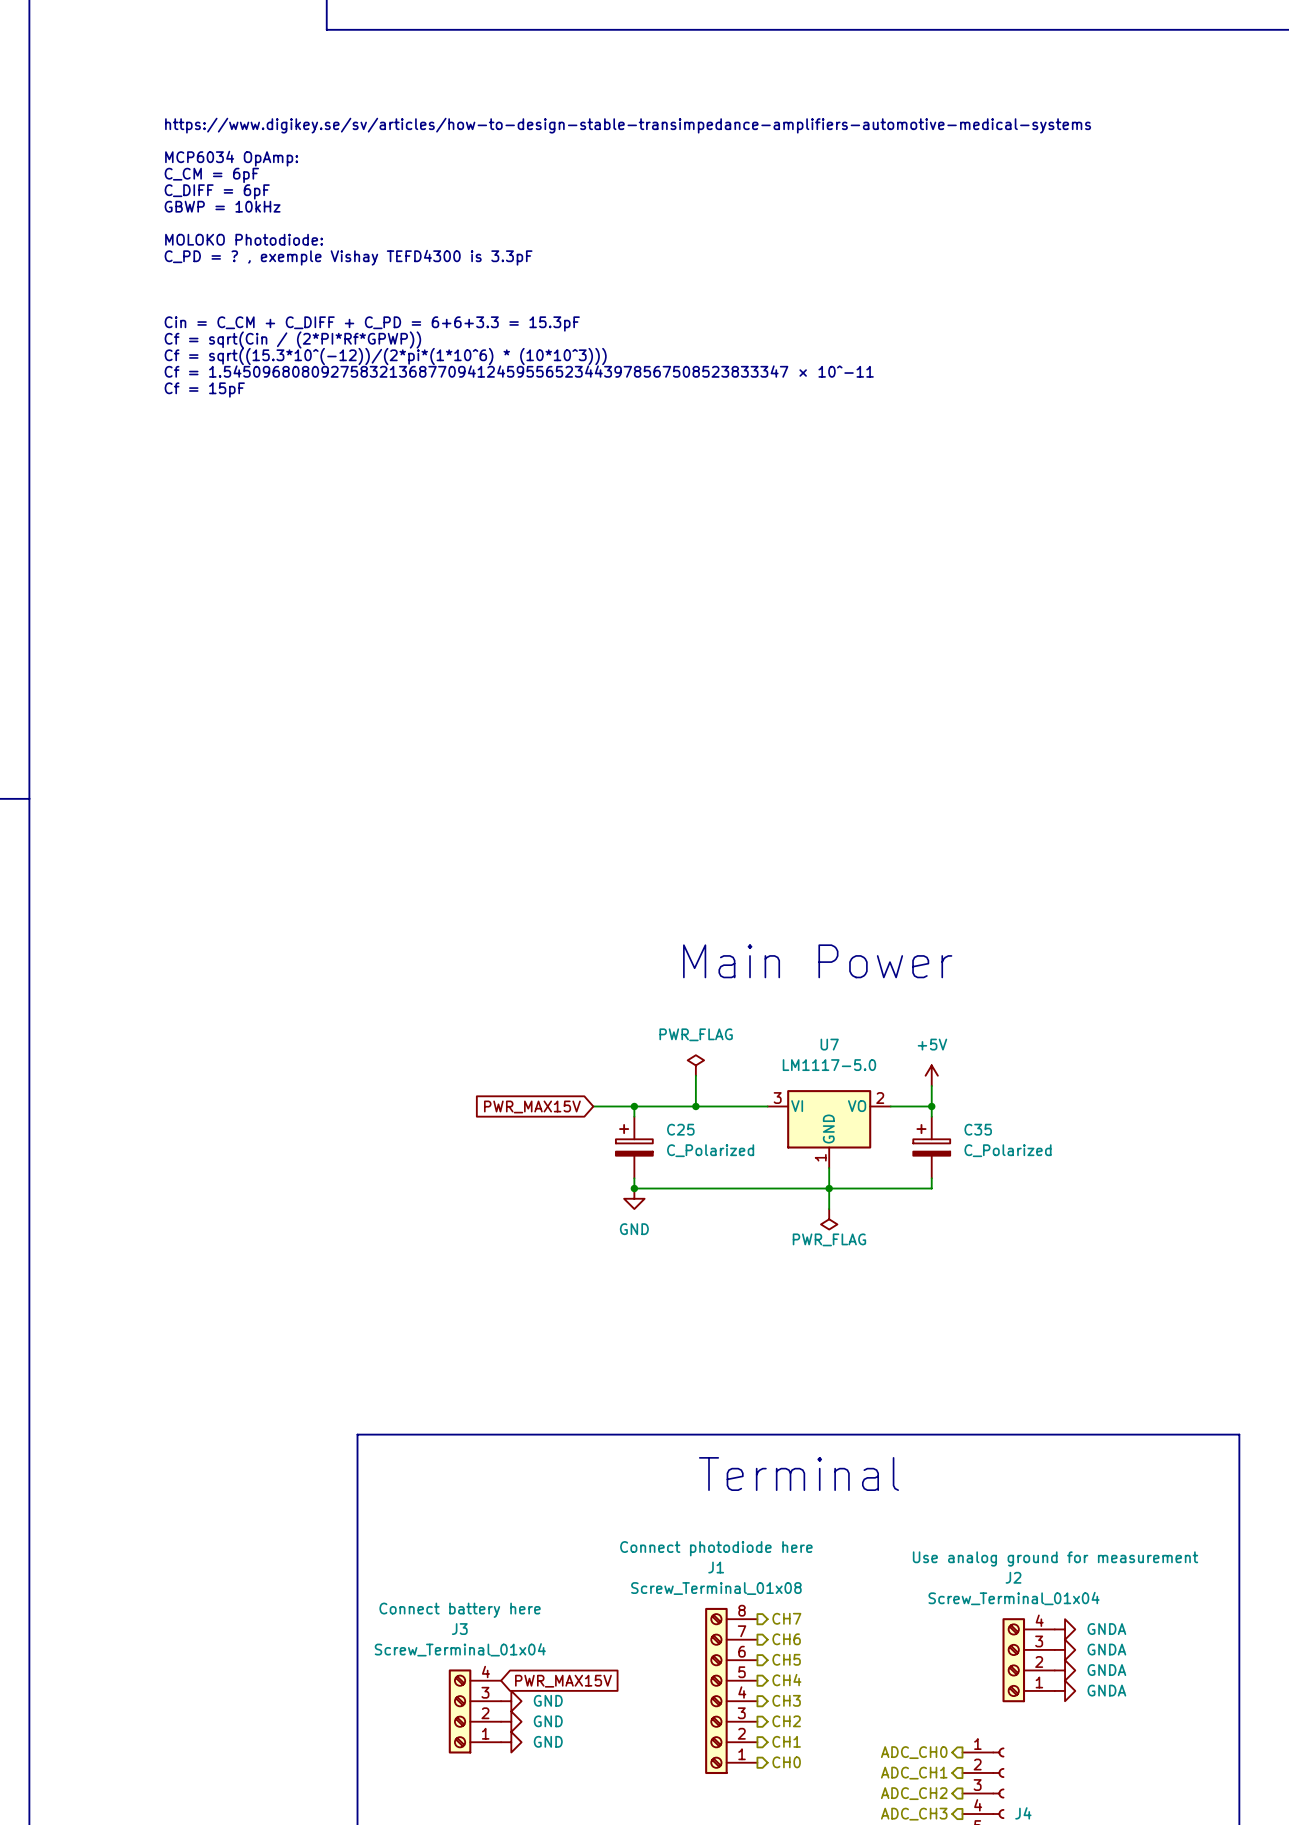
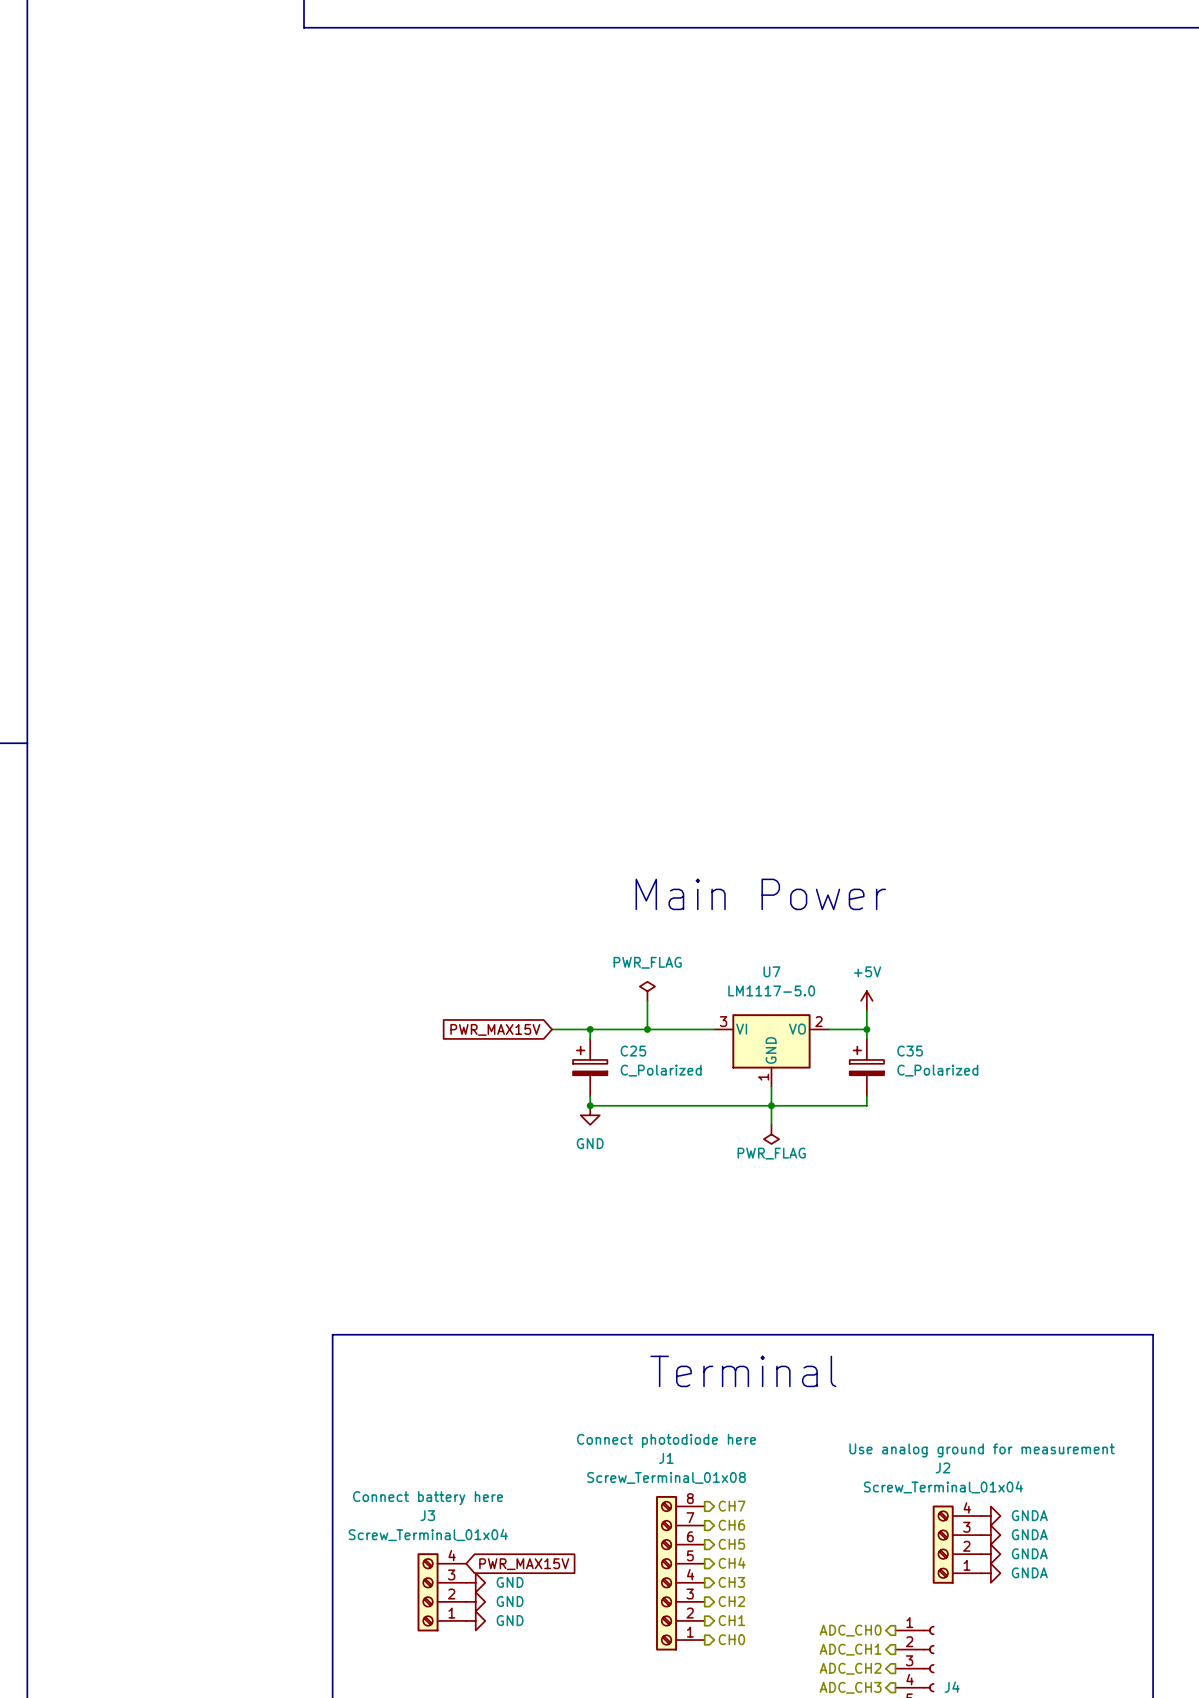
text: https://www.digikey.se/sv/articles/how-to-design-stable-transimpedance-amplifiers-automotive-medical-systems (628, 125) -> none
text: MCP6034 OpAmp: (231, 158) -> none
text: C_CM = 6pF (211, 175) -> none
text: C_DIFF = 6pF (217, 191) -> none
text: GBWP = 10kHz (222, 206) -> none
text: MOLOKO Photodiode: (244, 239) -> none
text: C_PD = ? , exemple Vishay TEFD4300 is 3.3pF (348, 257) -> none
text: Cin = C_CM + C_DIFF + C_PD = 6+6+3.3 = 15.3pF (372, 323) -> none
text: Cf = sqrt(Cin / (2*PI*Rf*GPWP)) (292, 340) -> none
text: Cf = sqrt((15.3*10^(-12))/(2*pi*(1*10^6) * (10*10^3))) (385, 356) -> none
text: Cf = 1.5450968080927583213687709412459556523443978567508523833347 × 10^-11 (519, 371) -> none
text: Cf = 15pF (204, 390) -> none

